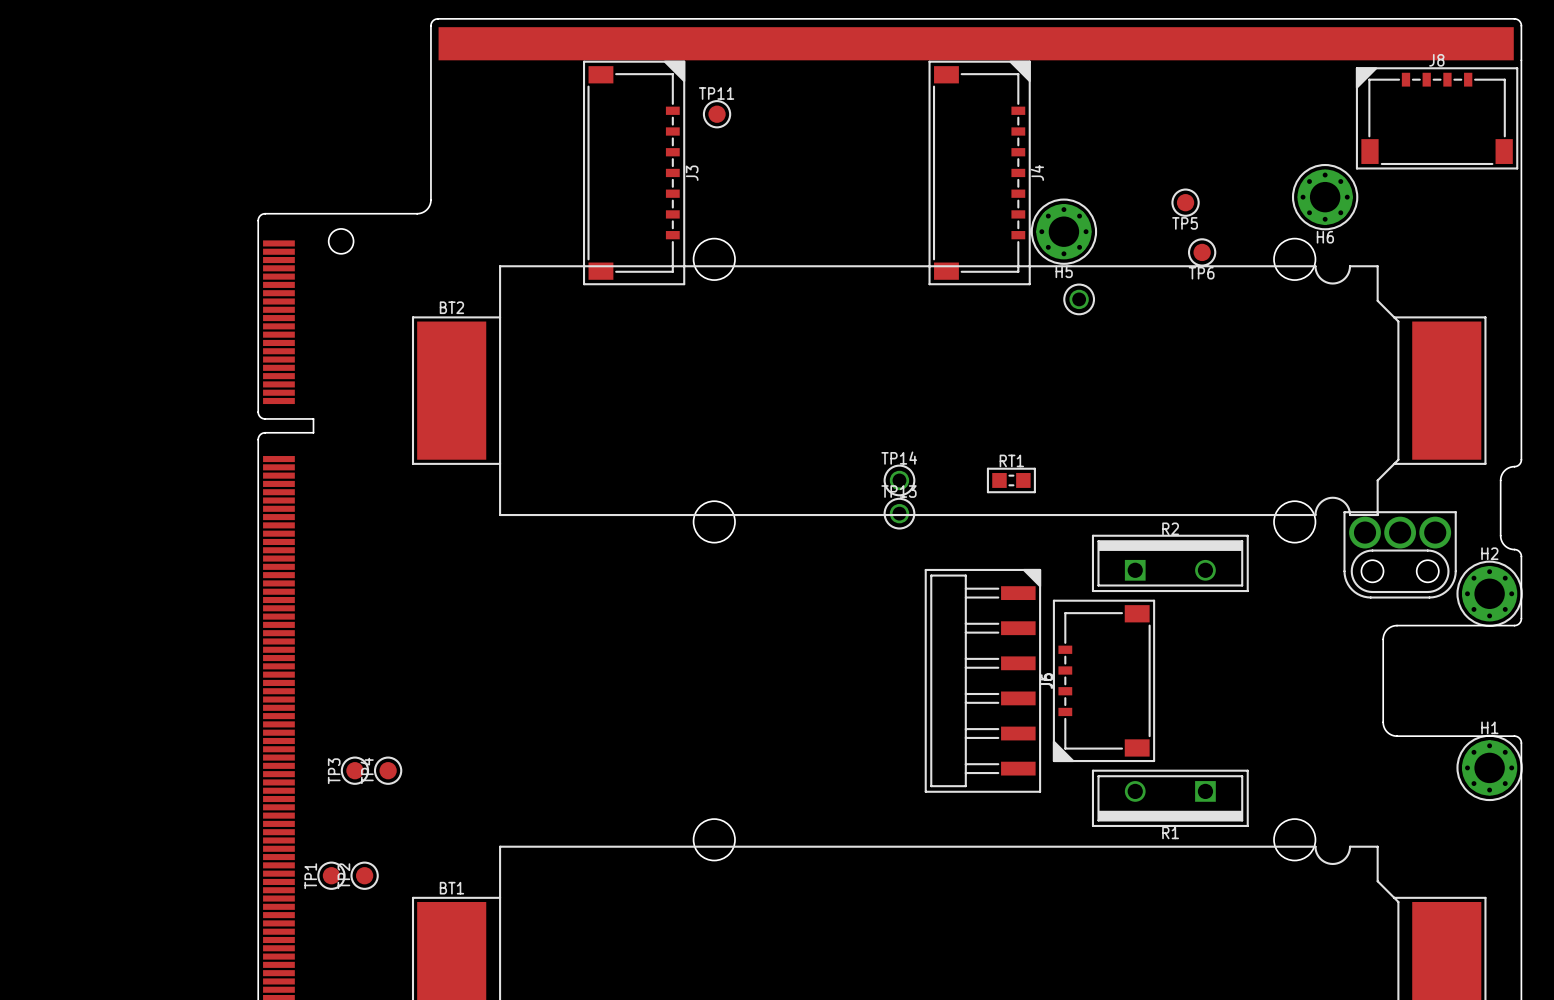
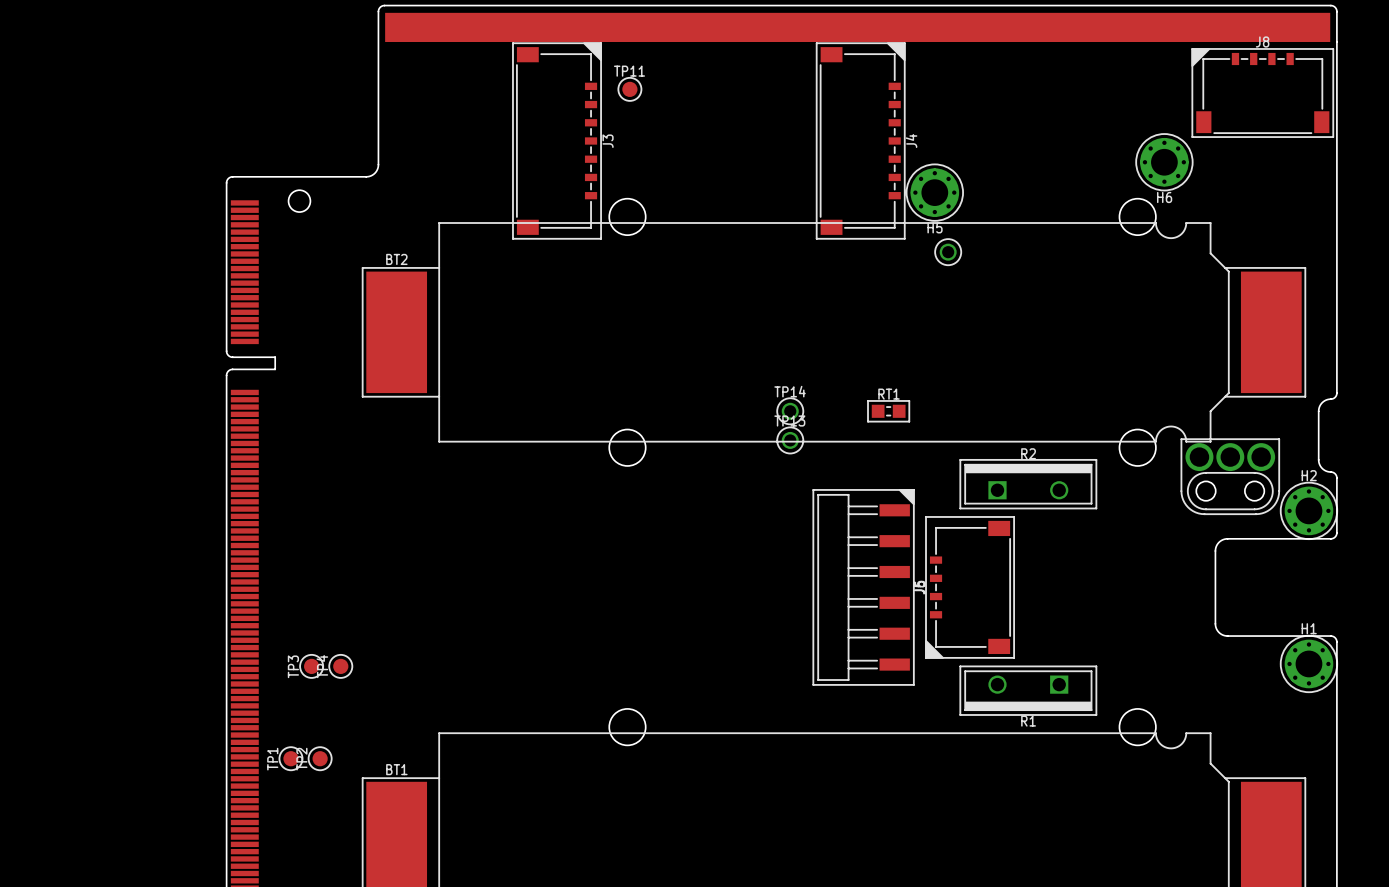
TP5: (1185, 202) -> none
TP6: (1202, 252) -> none

